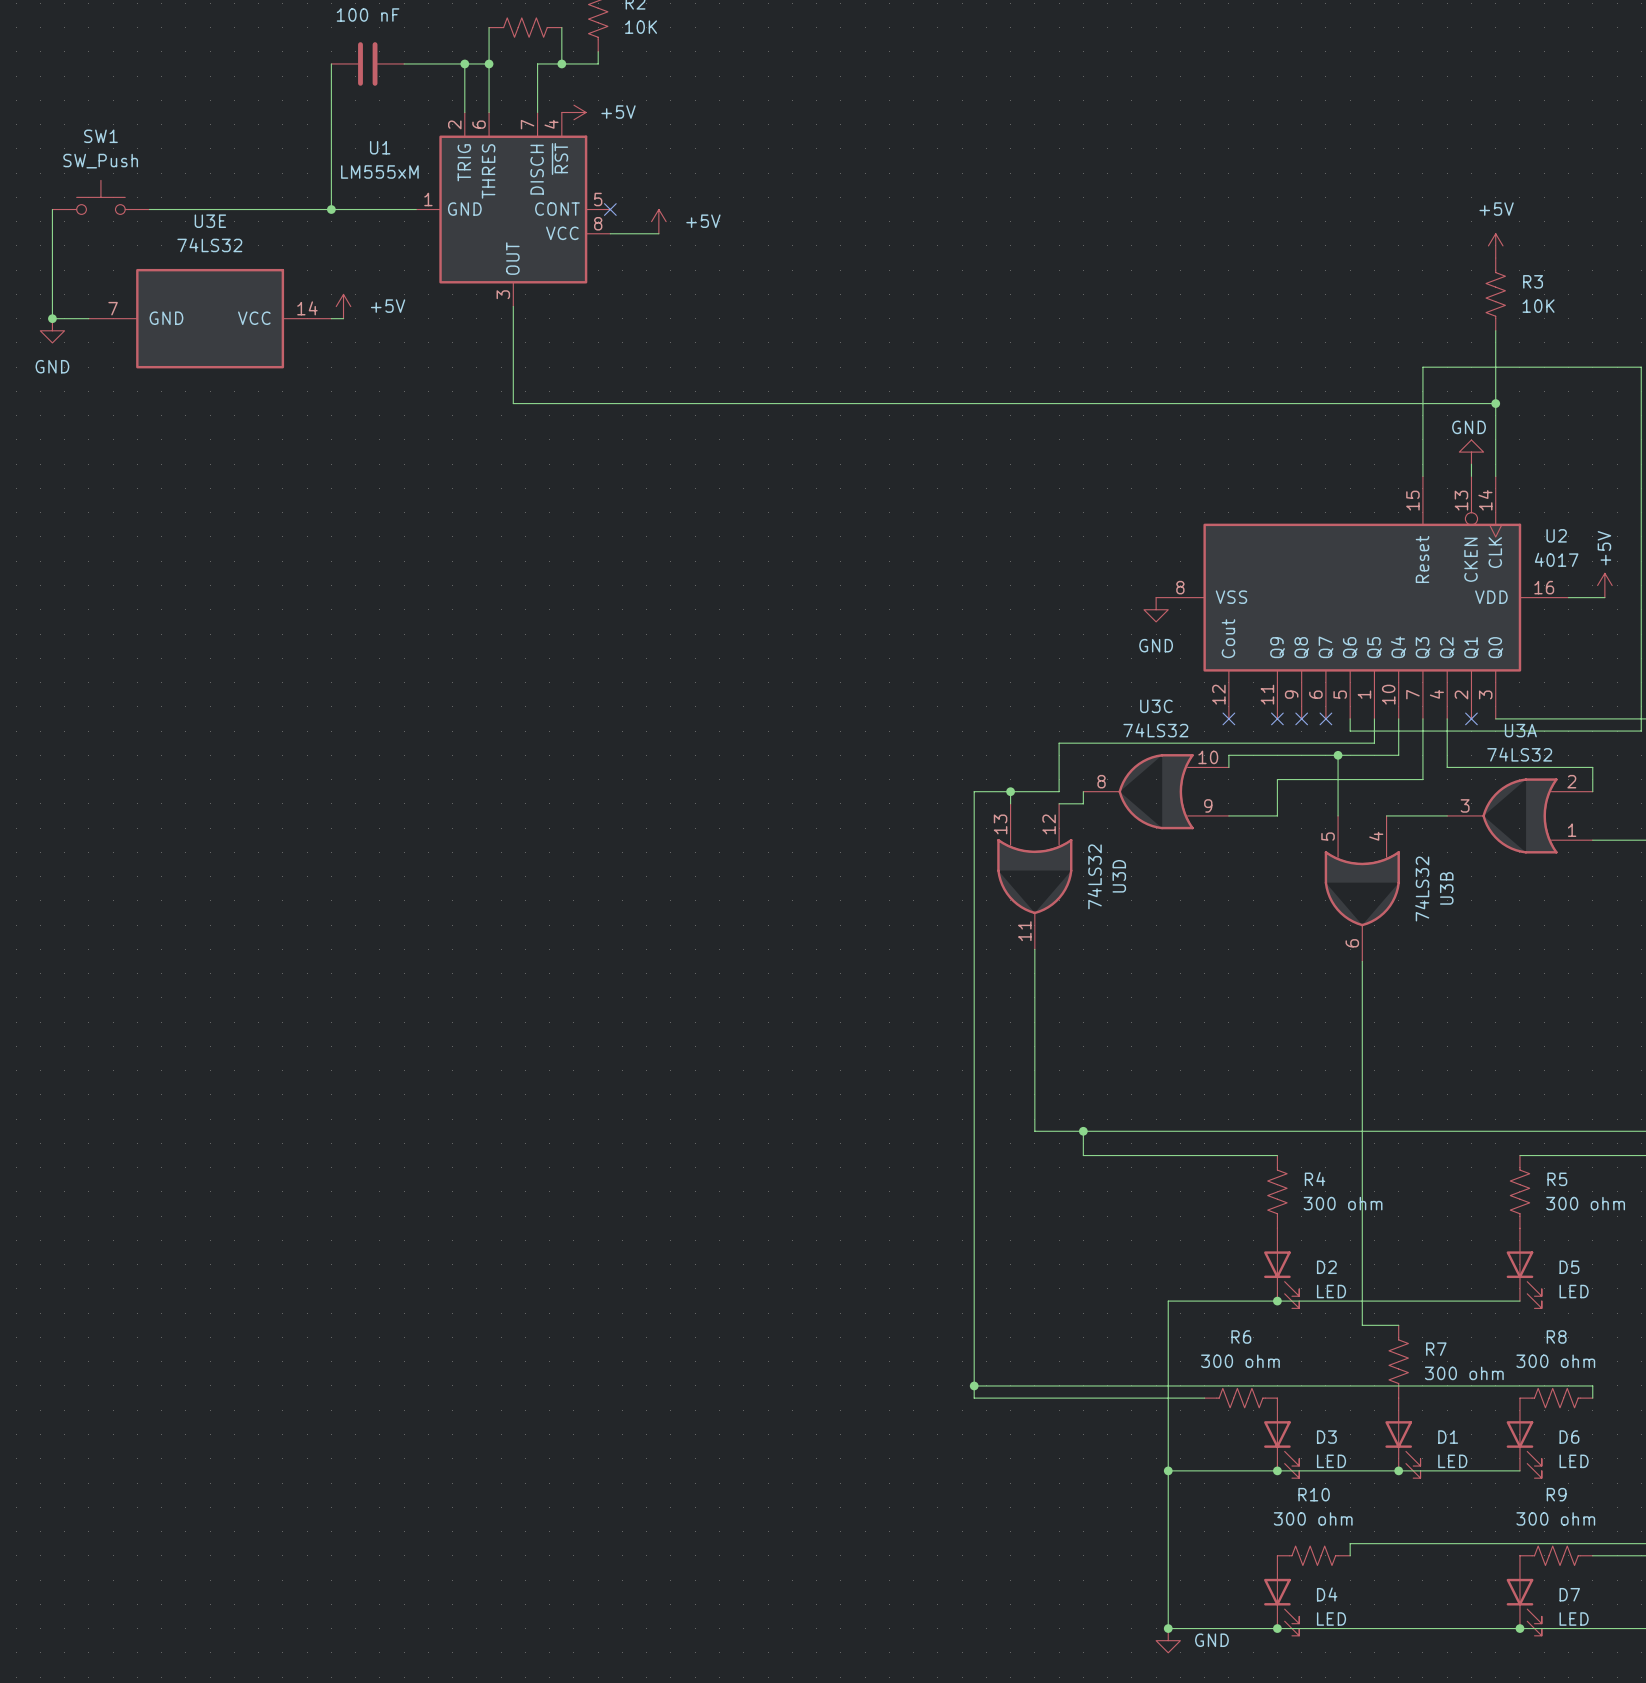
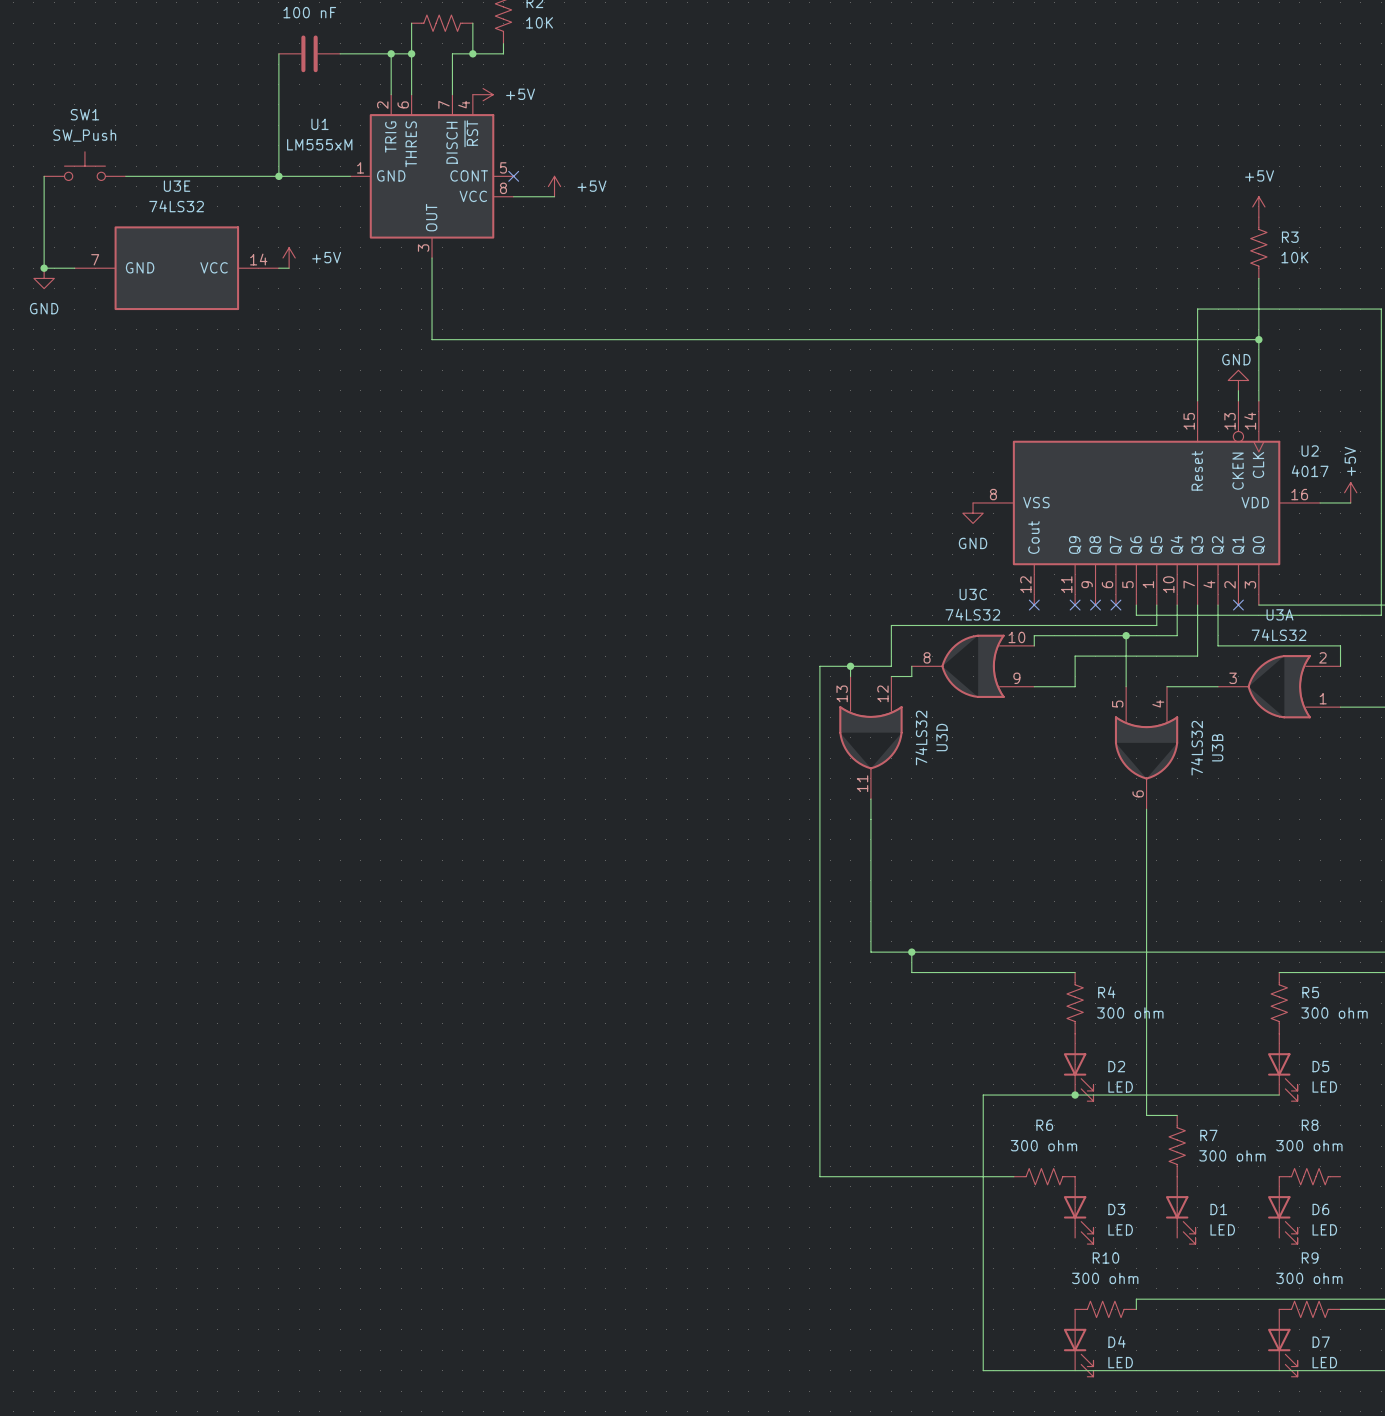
wire: (974, 1385) (1592, 1385) (1592, 1398) -> none
junction: (974, 1385) -> none
wire: (1168, 1470) (1519, 1470) -> none
junction: (1168, 1470) -> none
junction: (1277, 1470) -> none
junction: (1398, 1470) -> none
junction: (1168, 1628) -> none
junction: (1277, 1628) -> none
junction: (1519, 1628) -> none
power symbol: GND (1168, 1640) -> none

